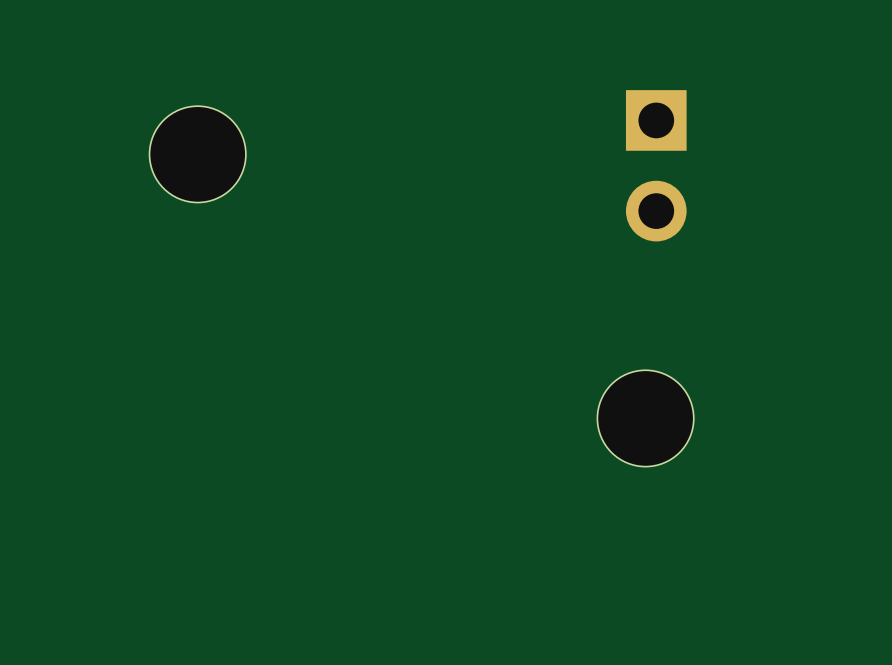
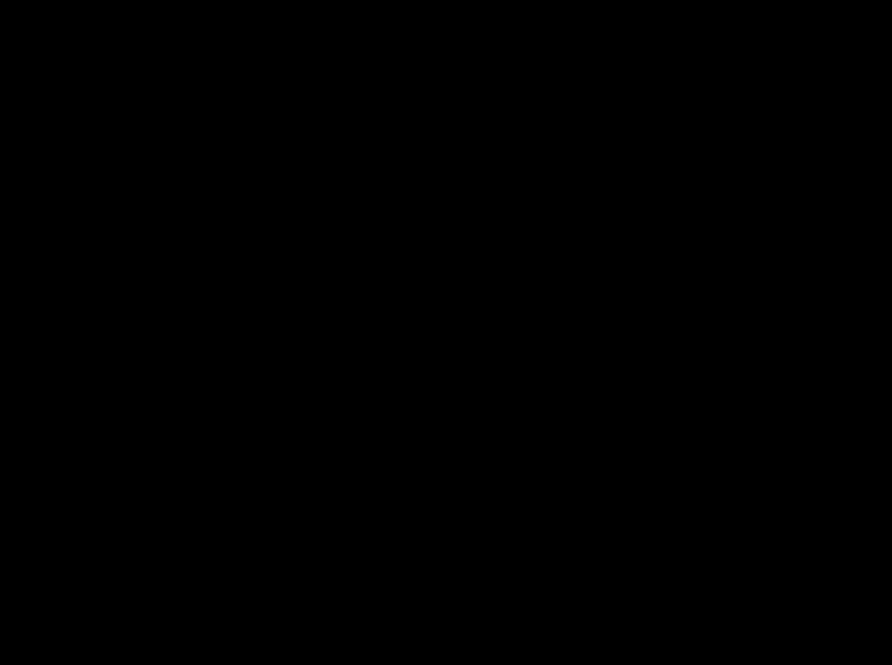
part: (197, 154) -> none
part: (656, 165) -> none
part: (645, 418) -> none

